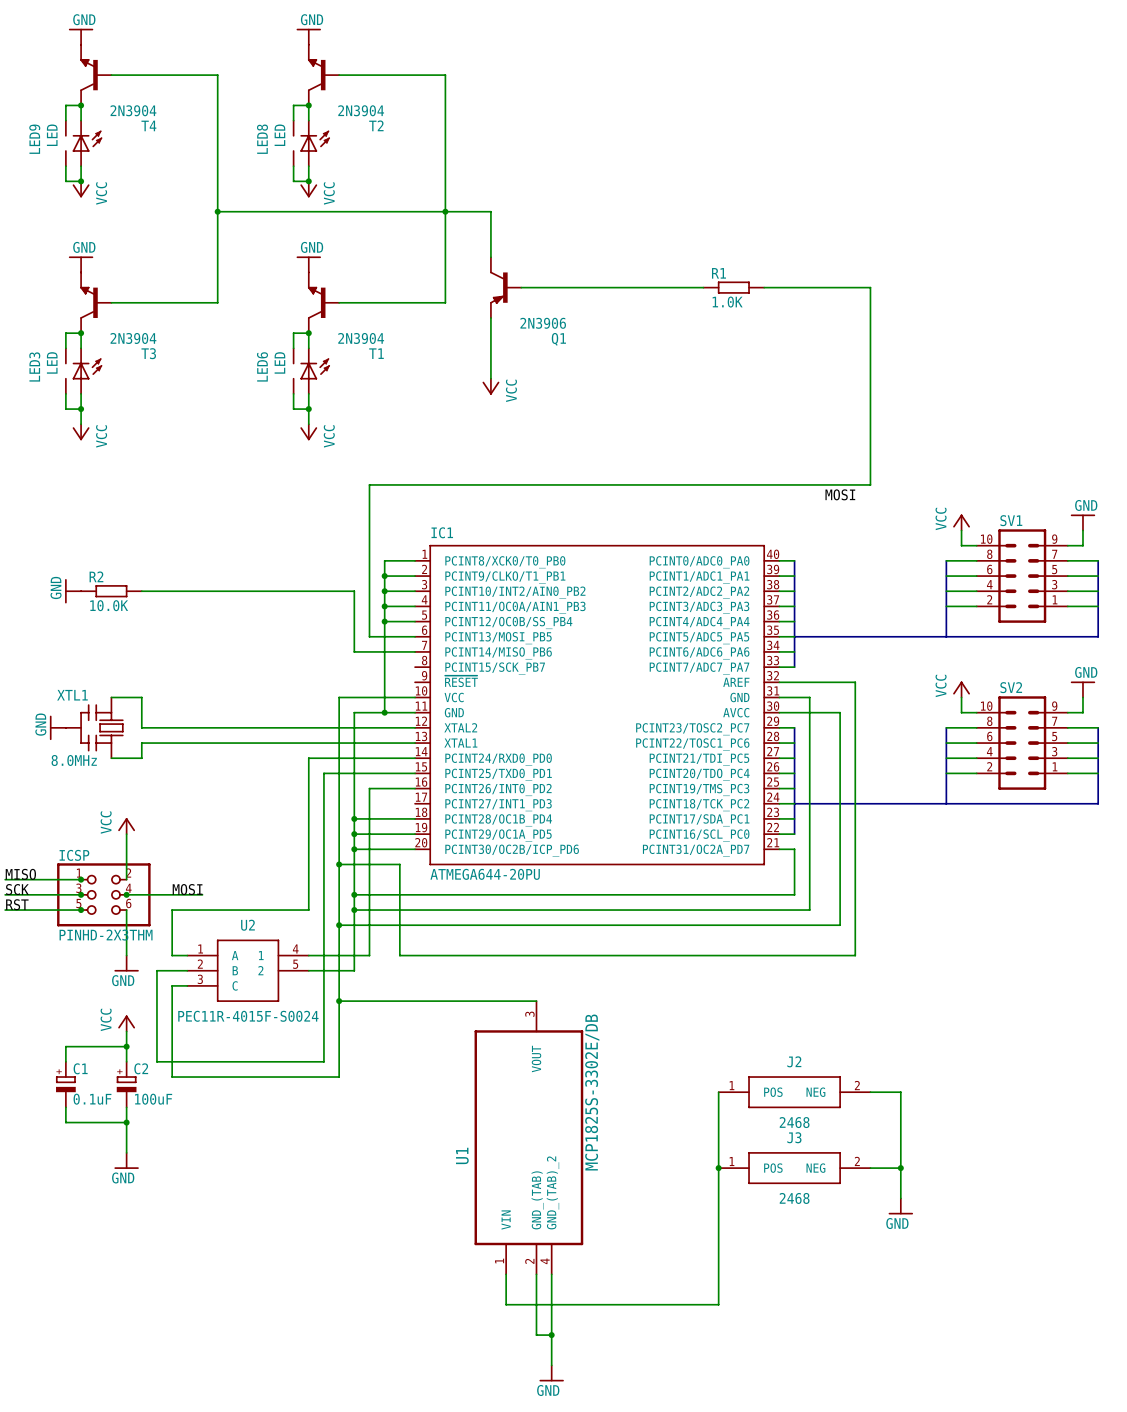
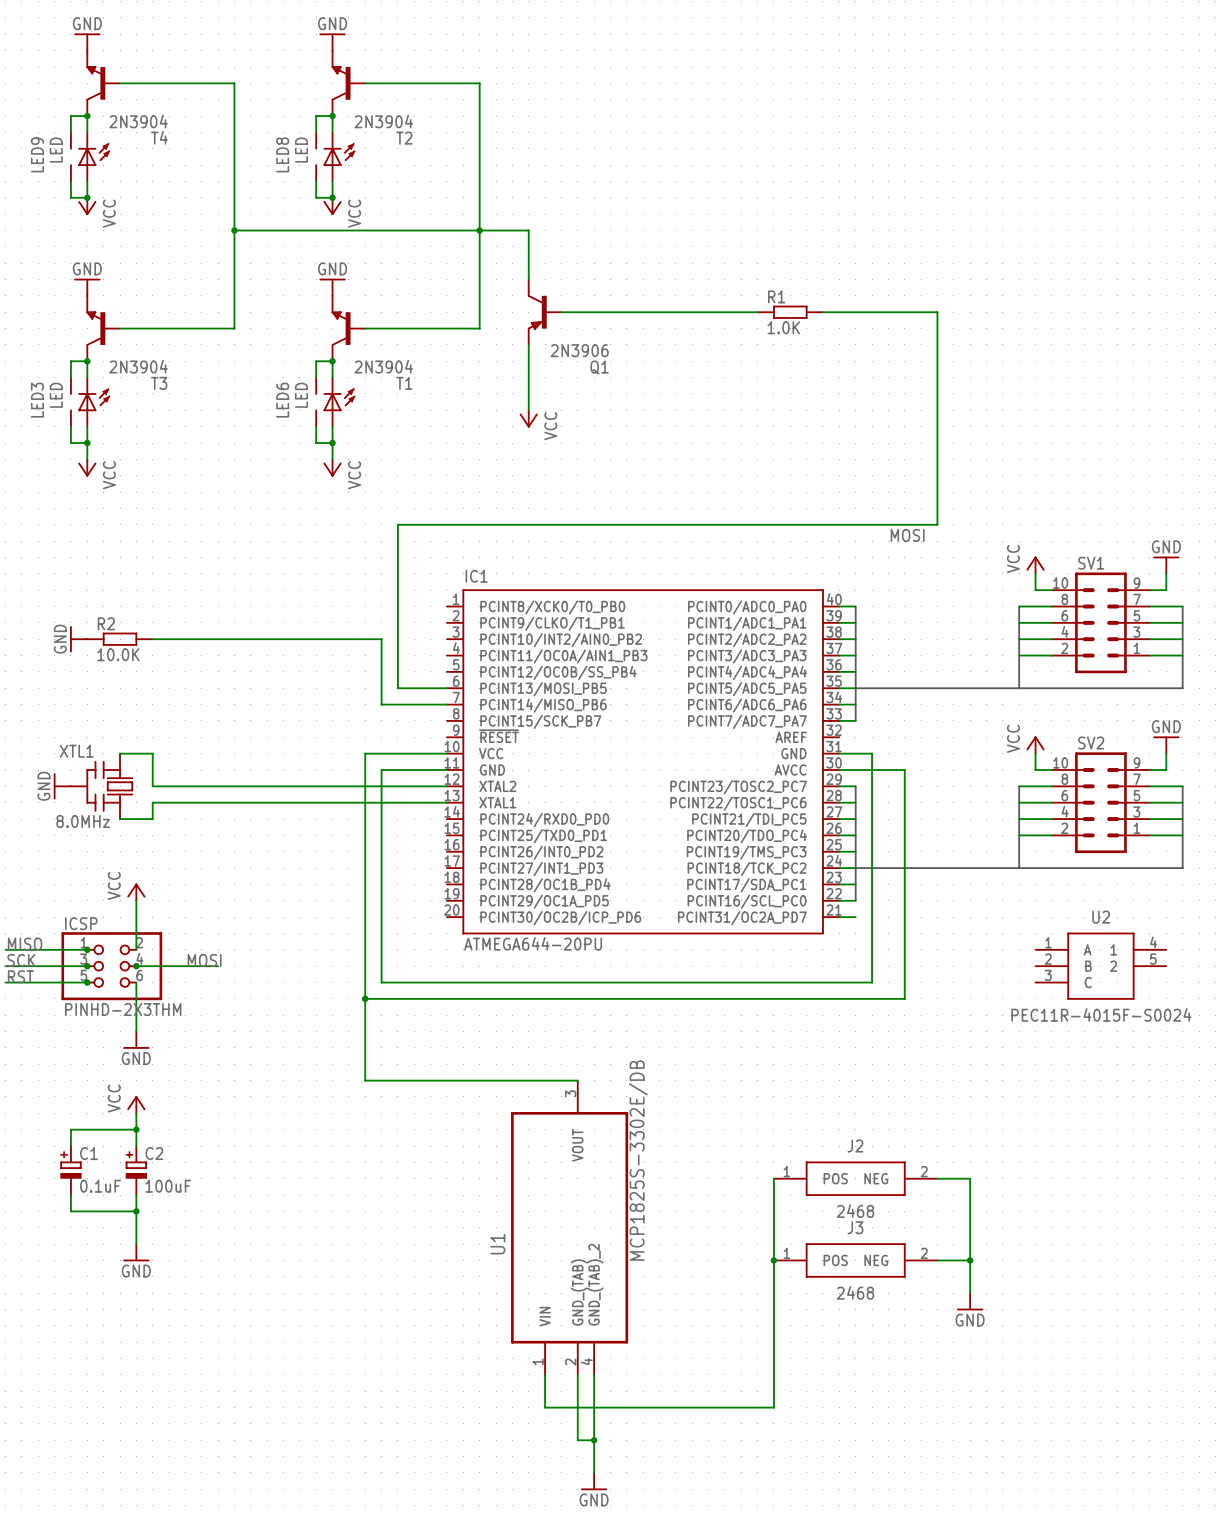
wire: (415, 560) (384, 560) (384, 712) -> none
wire: (384, 576) (415, 576) -> none
junction: (384, 576) -> none
wire: (384, 591) (415, 591) -> none
junction: (384, 591) -> none
wire: (384, 606) (415, 606) -> none
junction: (384, 606) -> none
wire: (384, 621) (415, 621) -> none
junction: (384, 621) -> none
wire: (779, 682) (855, 682) (855, 955) (399, 955) (399, 864) (339, 864) -> none
junction: (384, 712) -> none
wire: (415, 758) (308, 758) (308, 910) (172, 910) (172, 955) (187, 955) -> none
wire: (415, 773) (323, 773) (323, 1061) (156, 1061) (156, 970) (187, 970) -> none
wire: (415, 788) (369, 788) (369, 955) (308, 955) -> none
wire: (354, 818) (415, 818) -> none
junction: (354, 818) -> none
wire: (354, 834) (415, 834) -> none
junction: (354, 834) -> none
wire: (354, 849) (415, 849) -> none
junction: (354, 849) -> none
wire: (794, 849) (794, 894) (354, 894) -> none
junction: (339, 864) -> none
junction: (354, 894) -> none
wire: (354, 910) (354, 970) (308, 970) -> none
junction: (354, 910) -> none
U2 position: (248, 970) -> (1100, 966)
wire: (187, 985) (172, 985) (172, 1077) (339, 1077) (339, 1001) -> none
junction: (339, 1001) -> none

